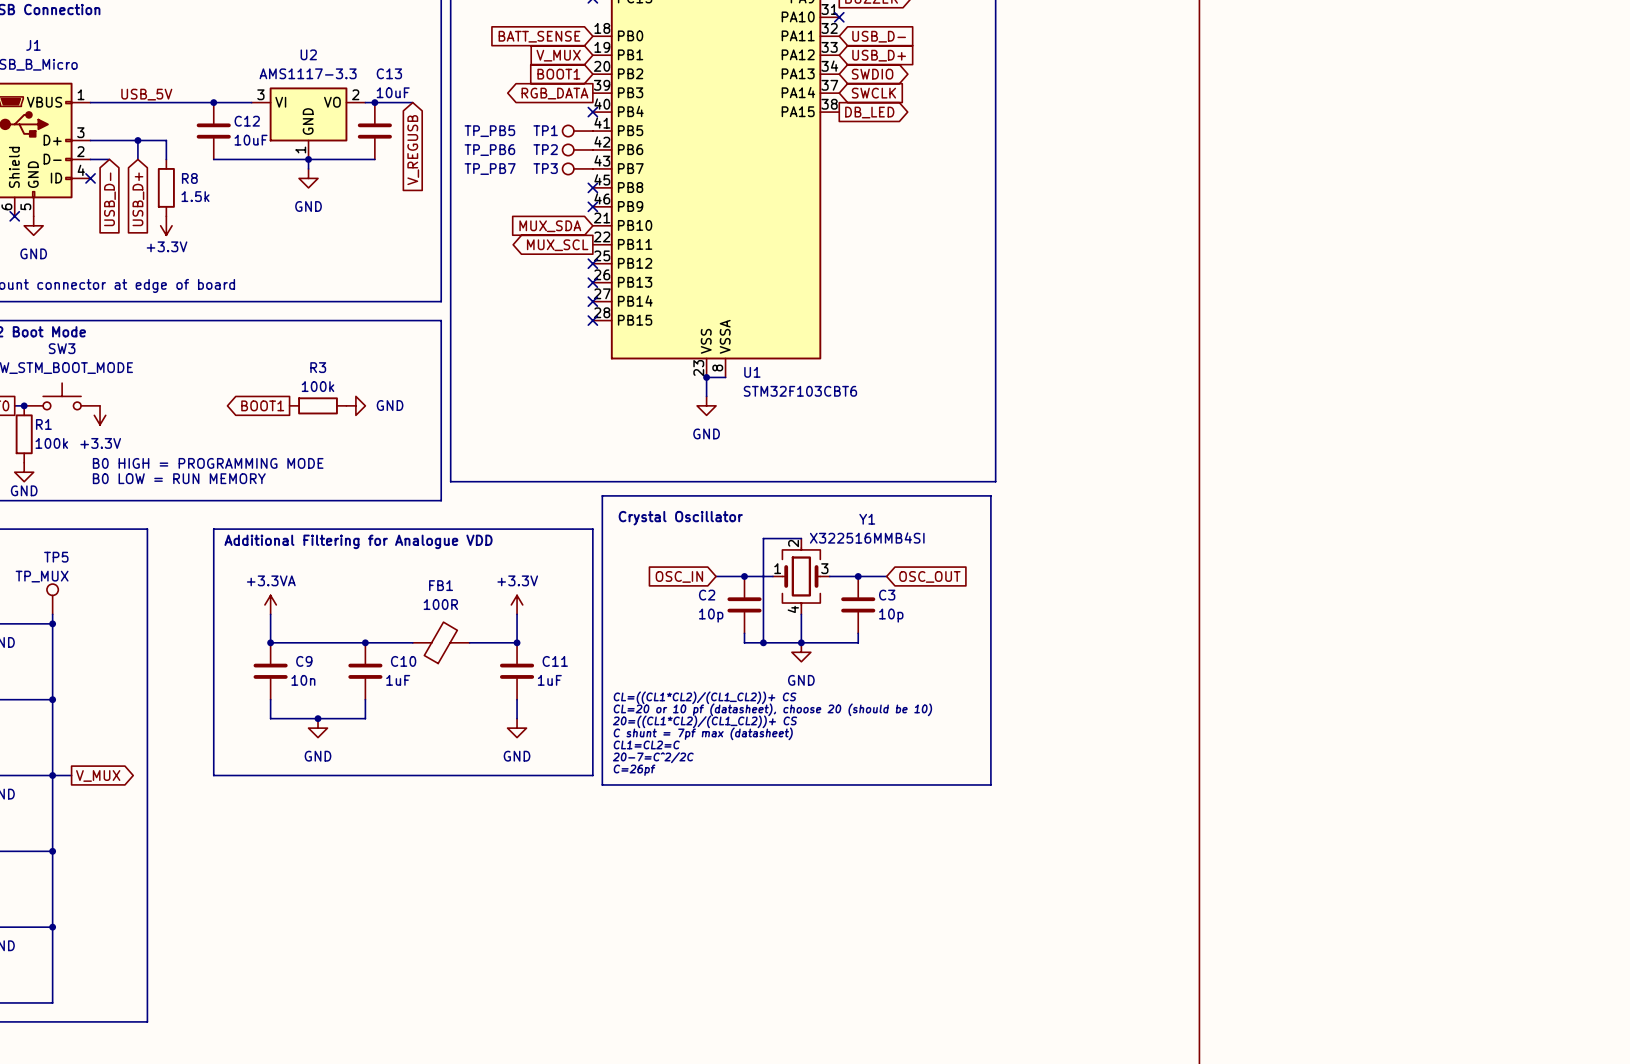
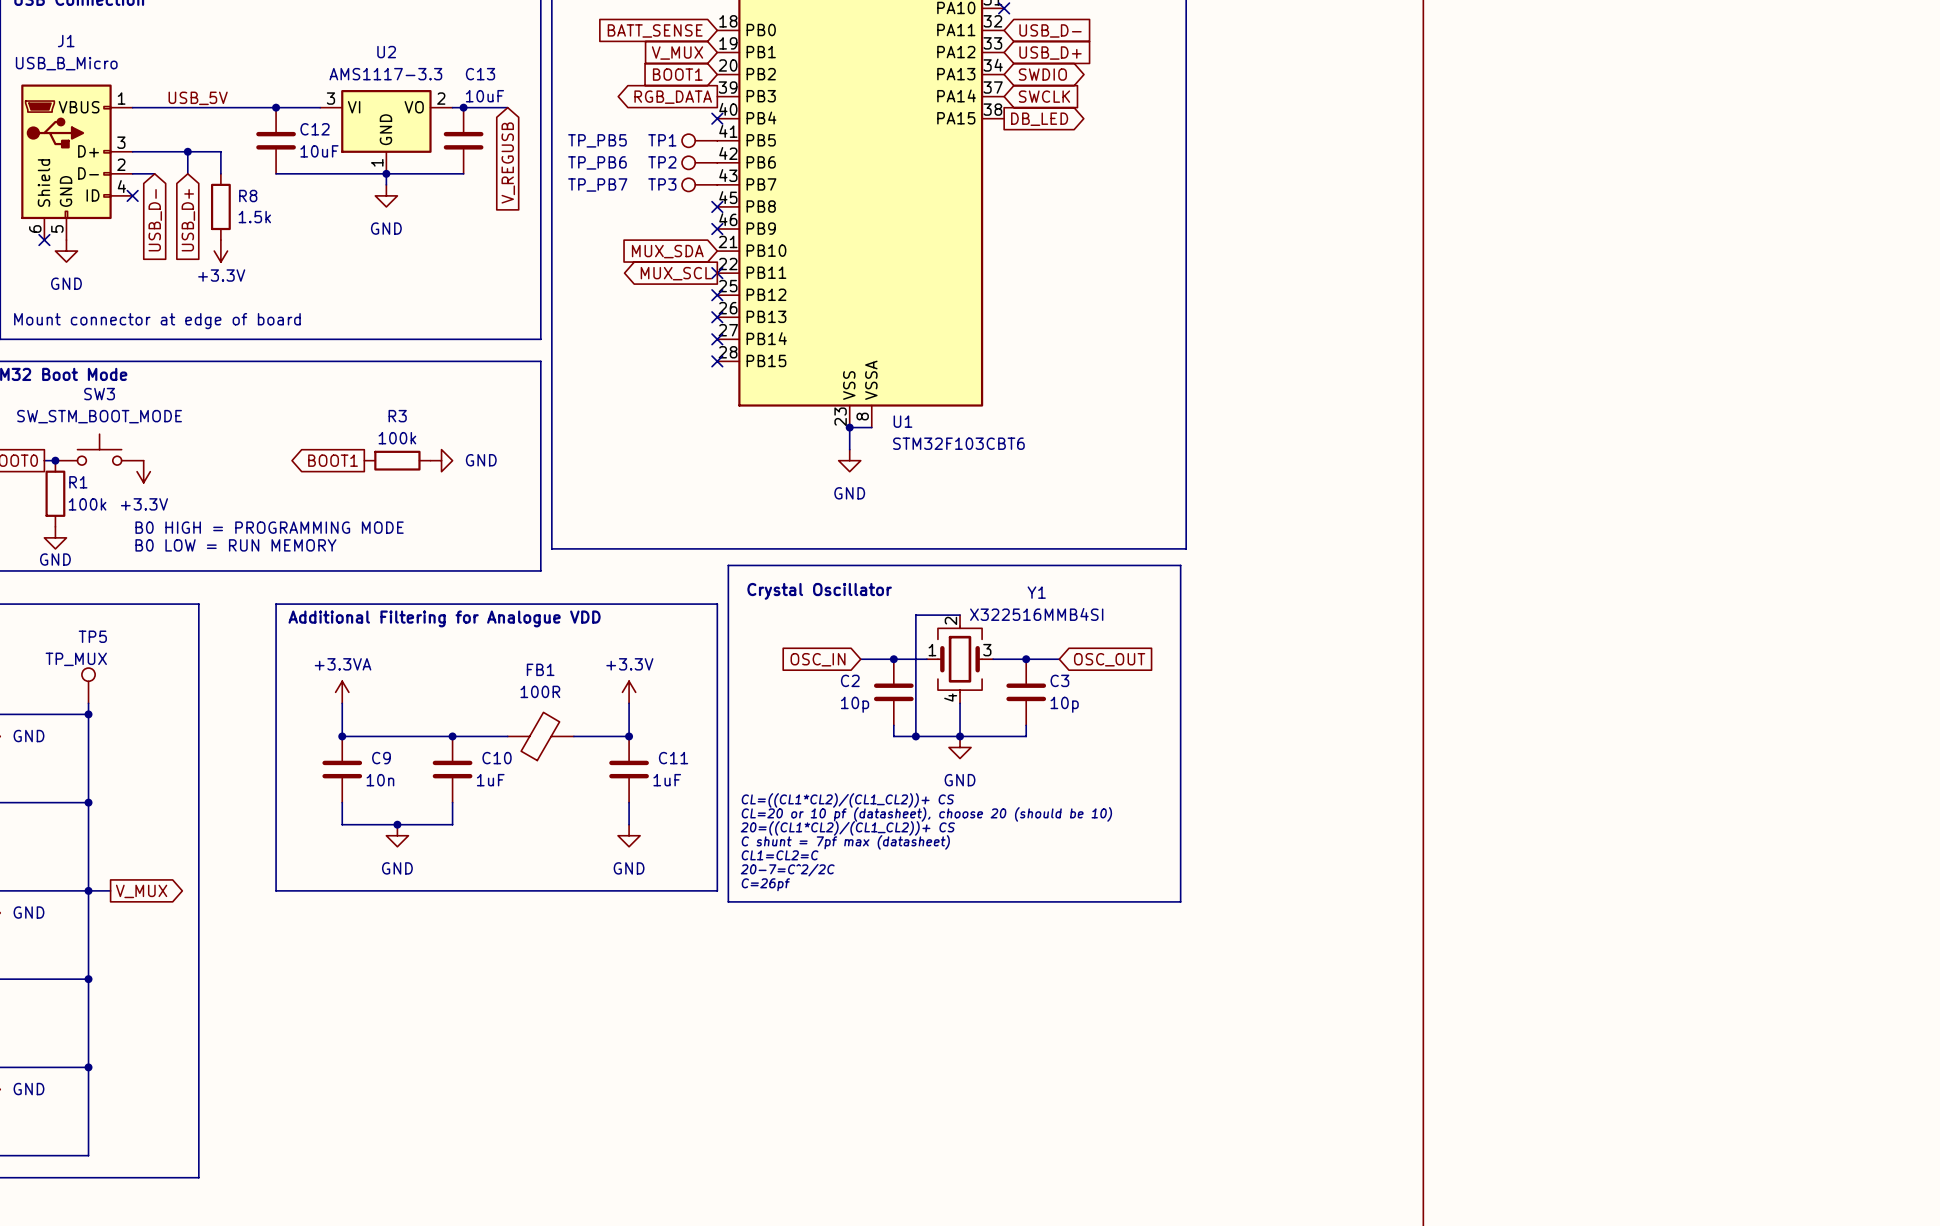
no-connect mark: none -> (717, 273)

